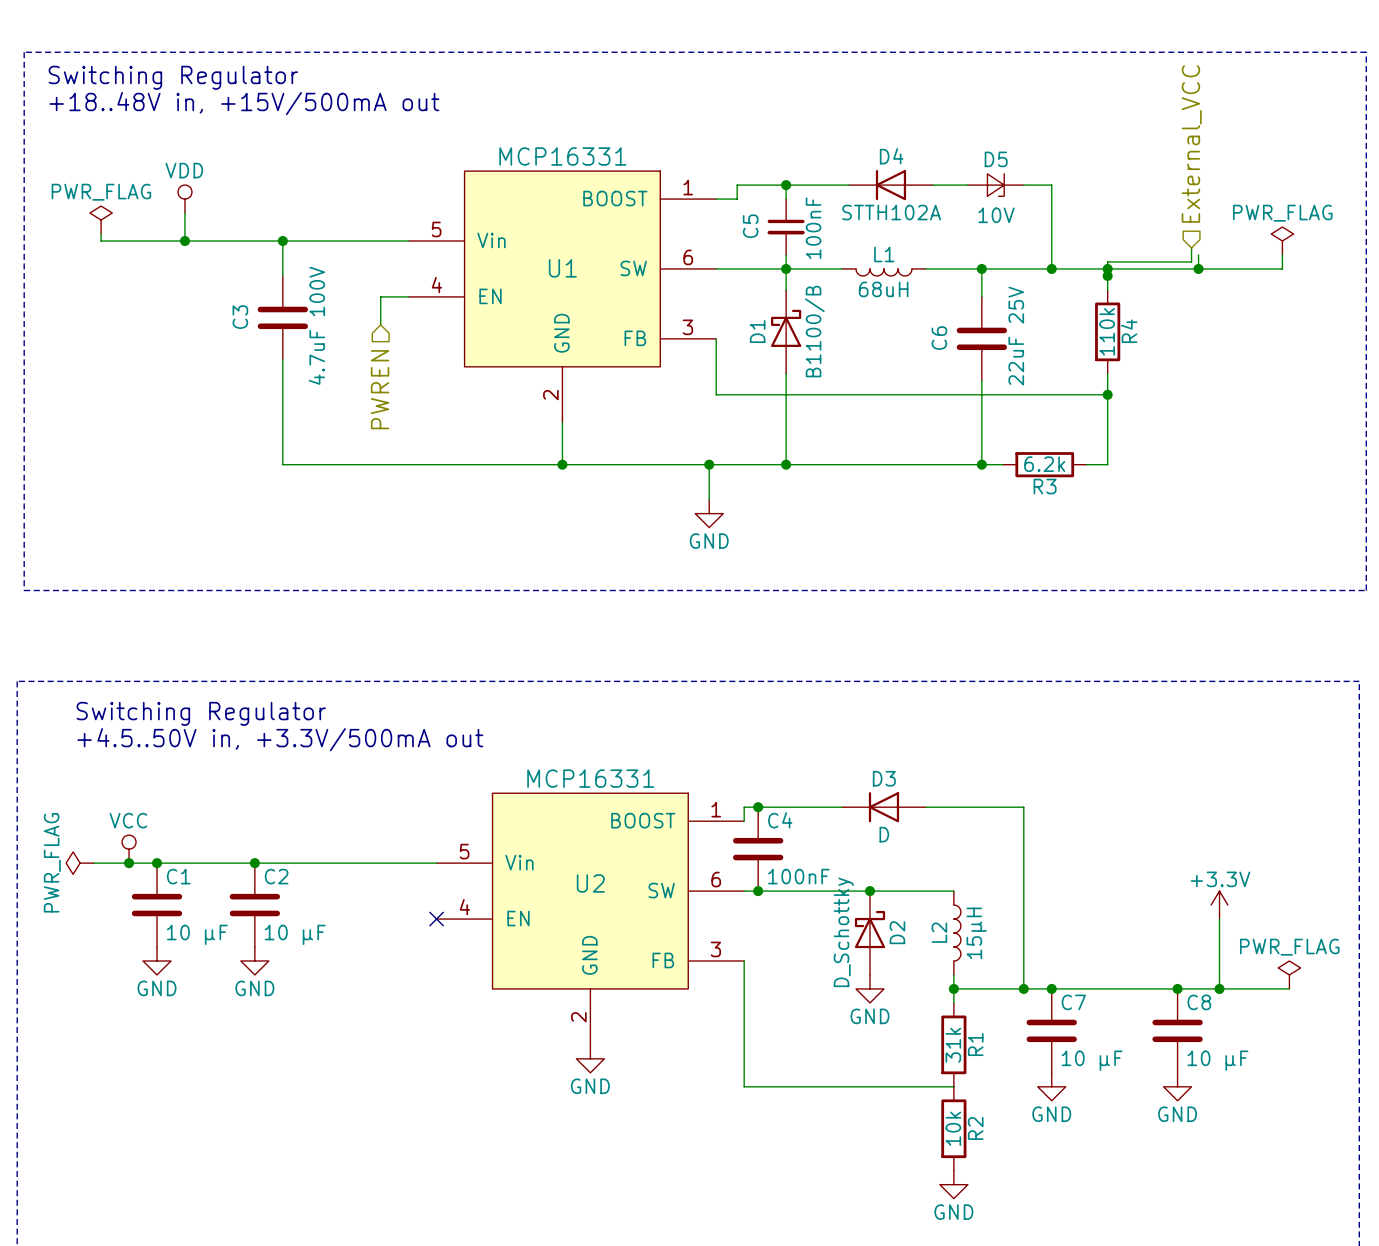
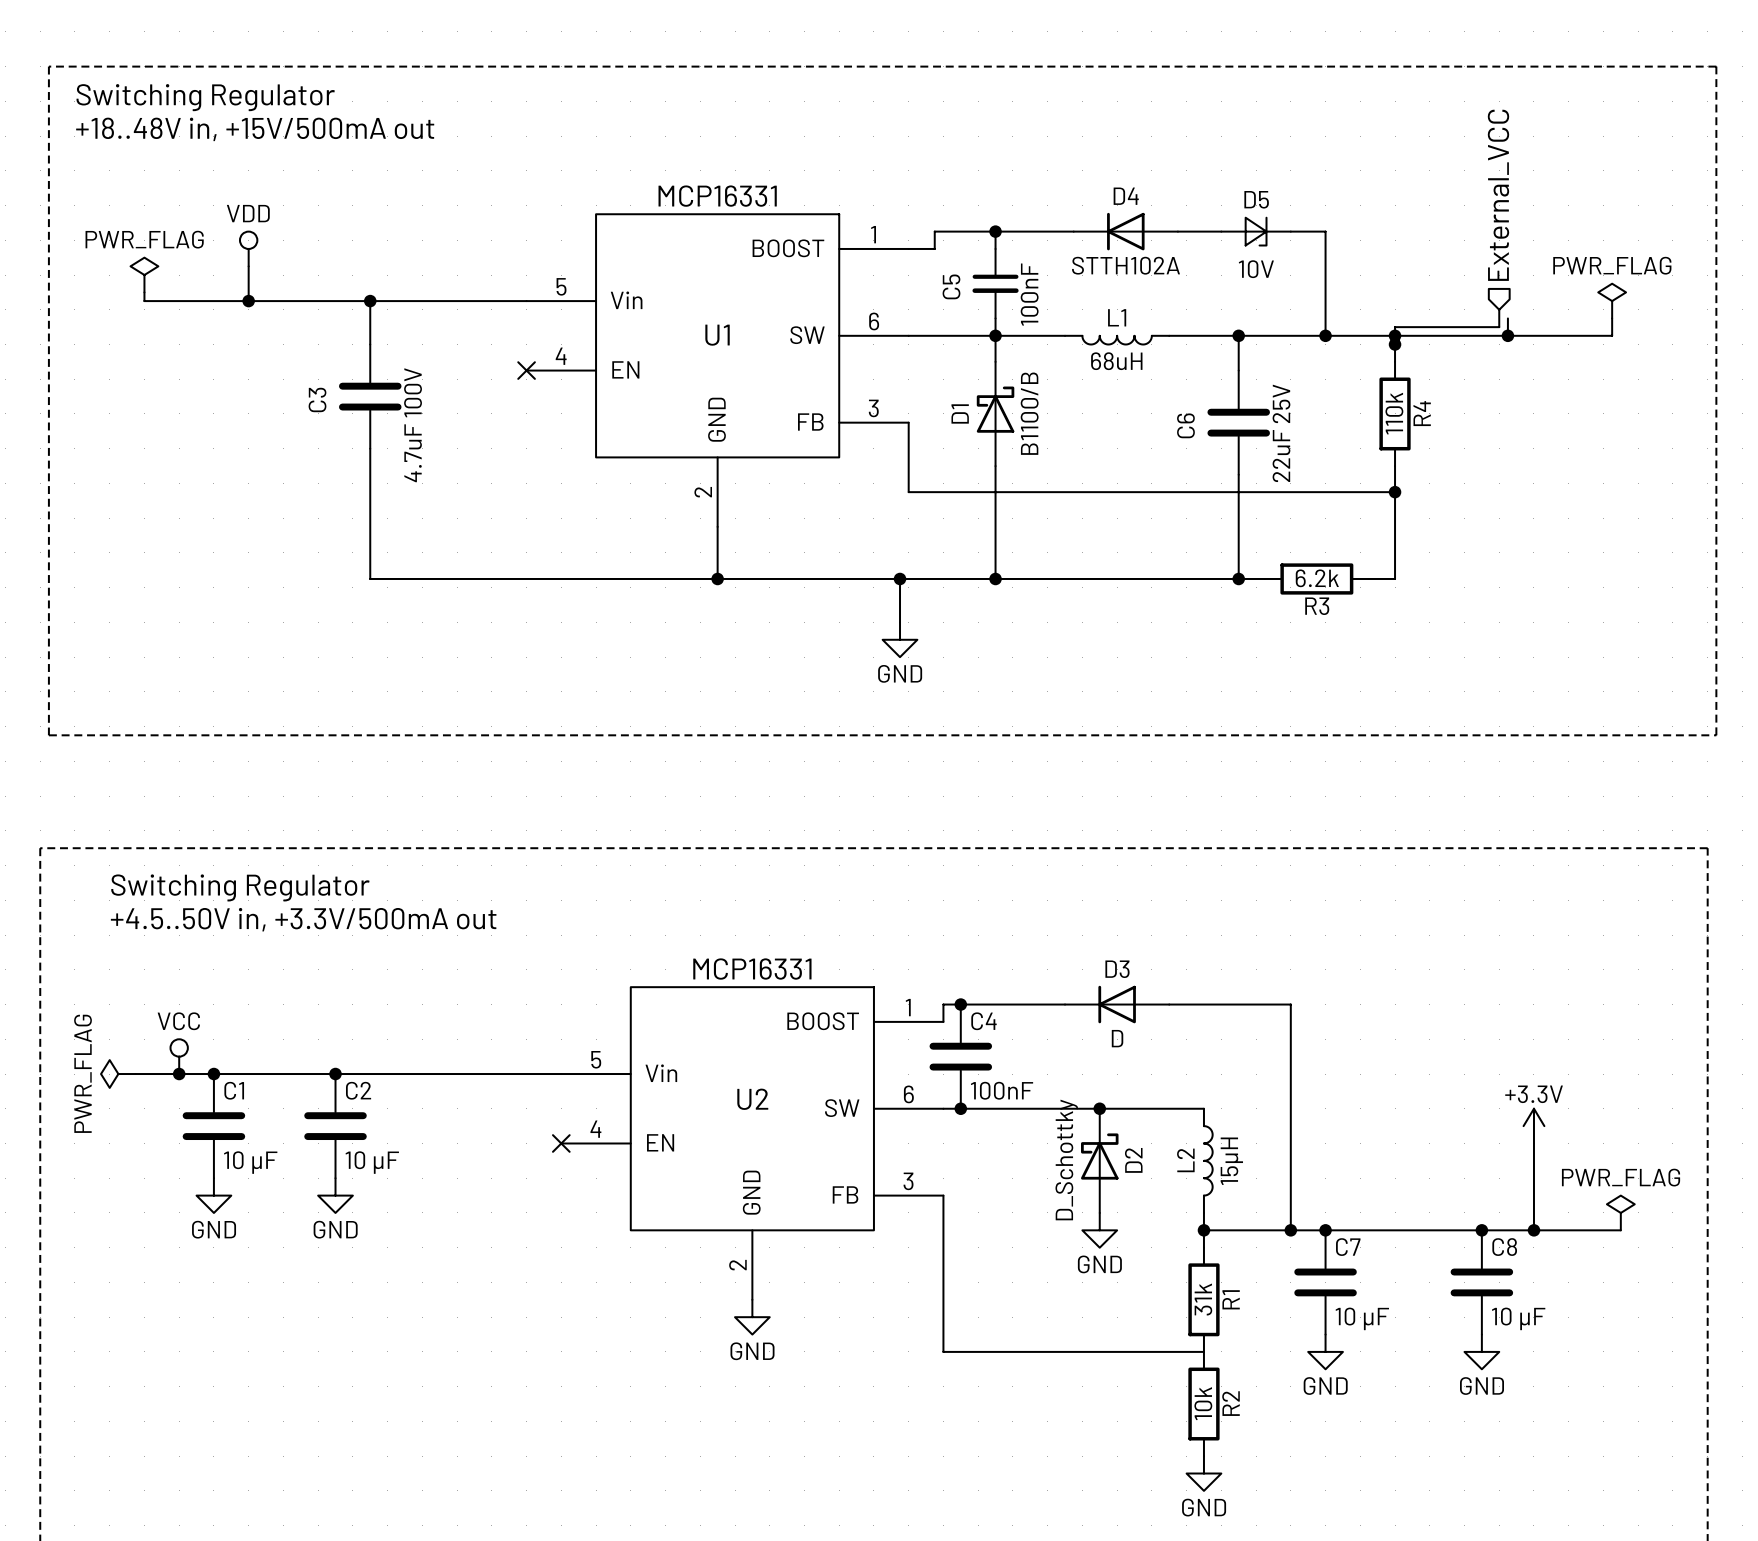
wire: (408, 296) (380, 296) (380, 324) -> none
no-connect mark: none -> (526, 370)
hierarchical label: PWREN (380, 389) -> none

